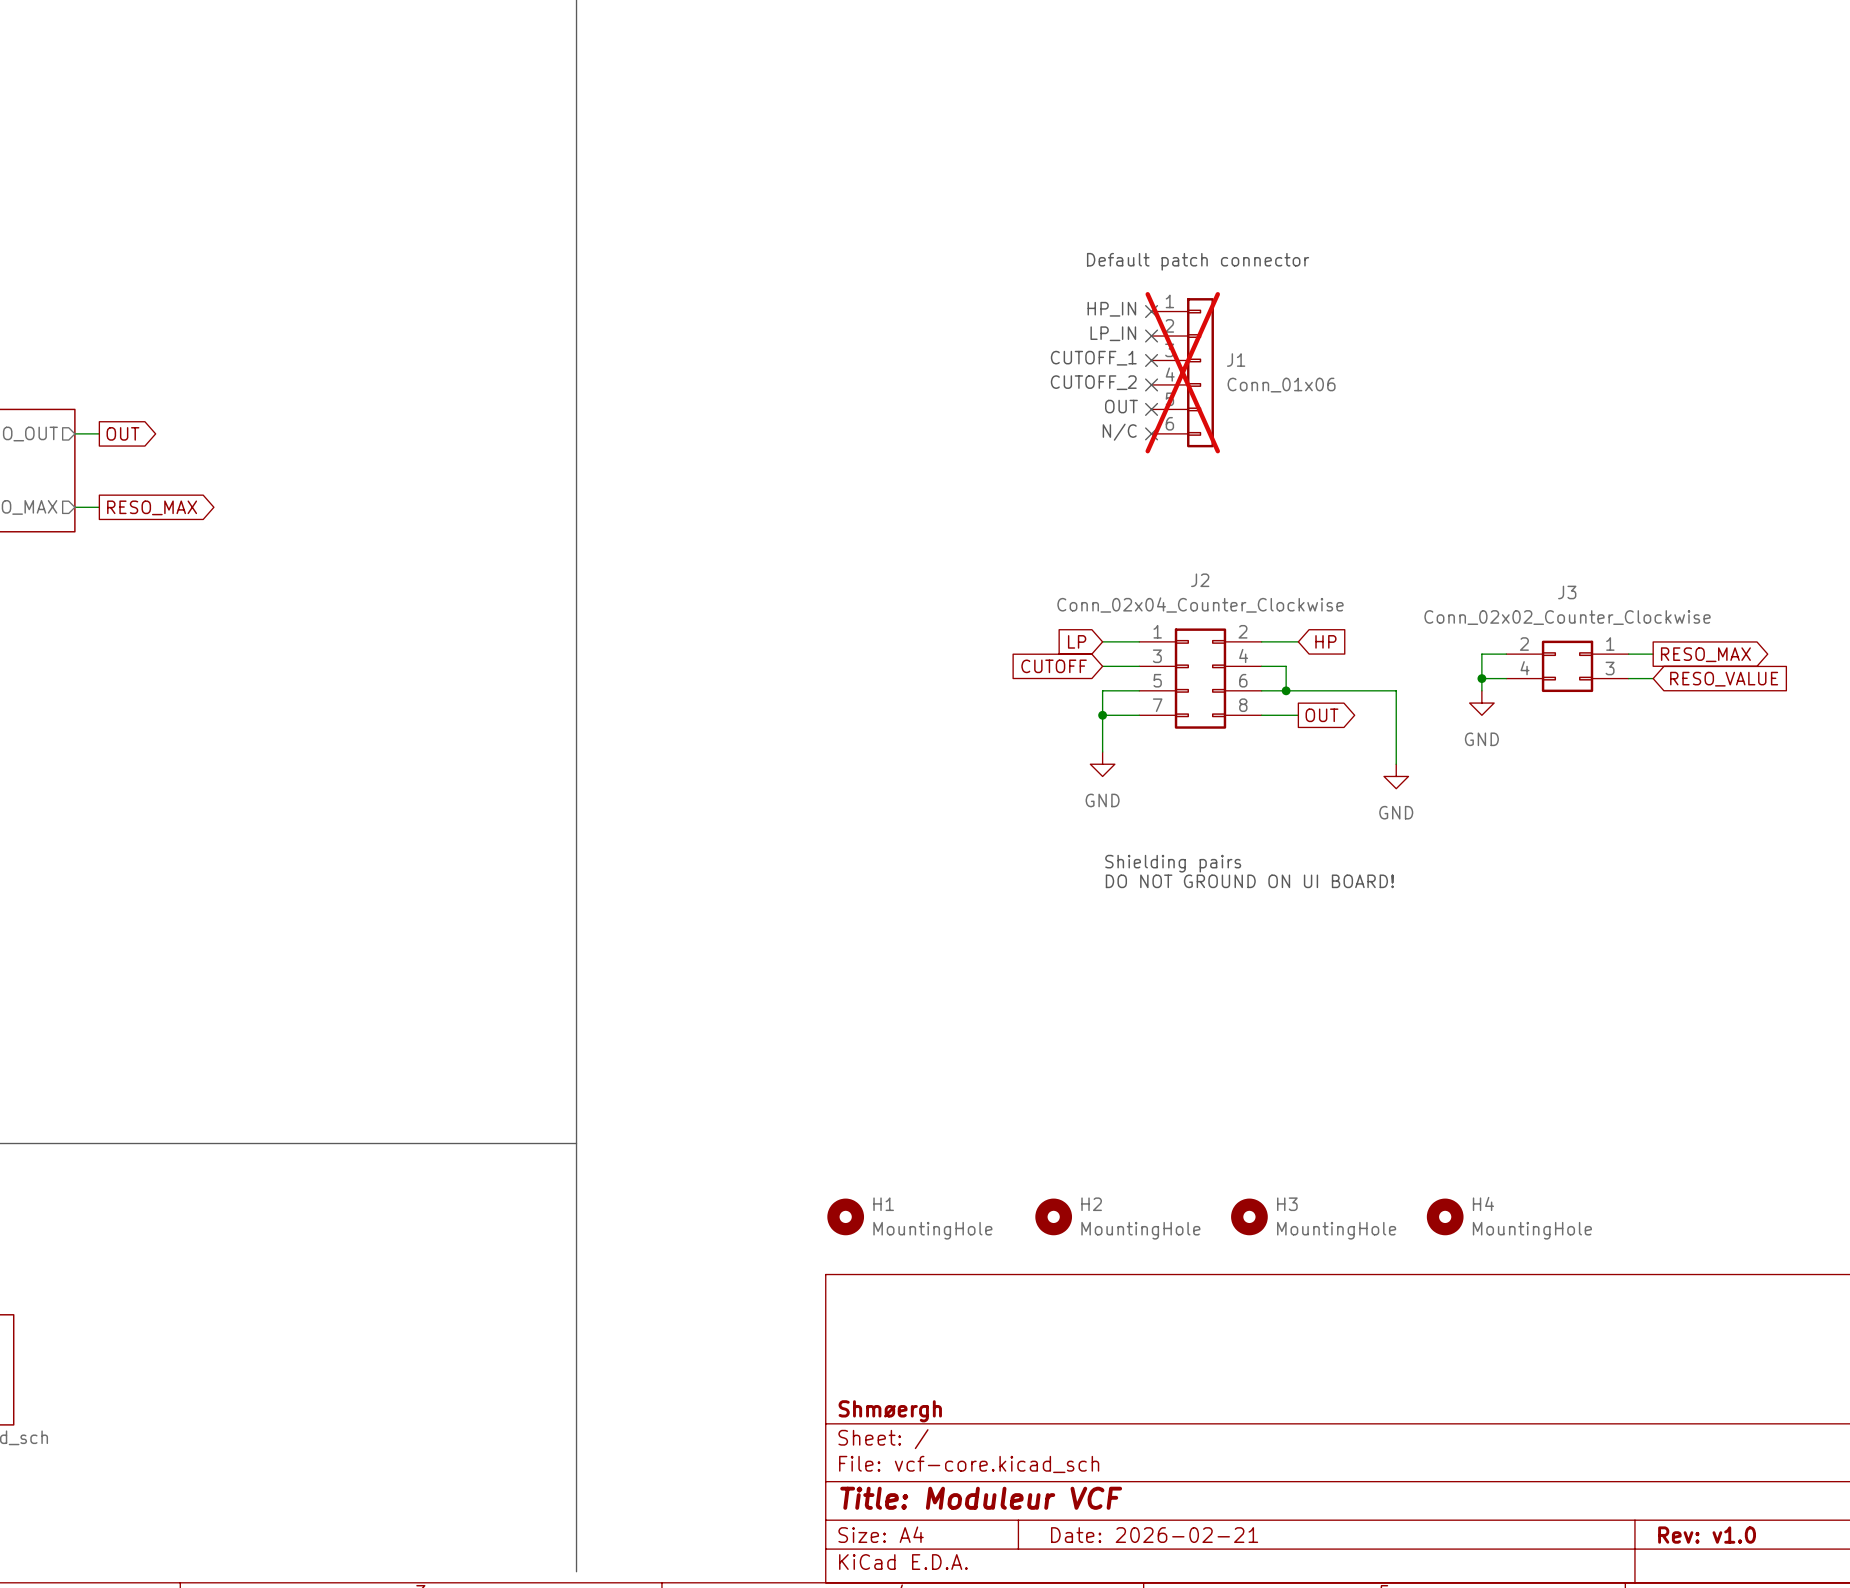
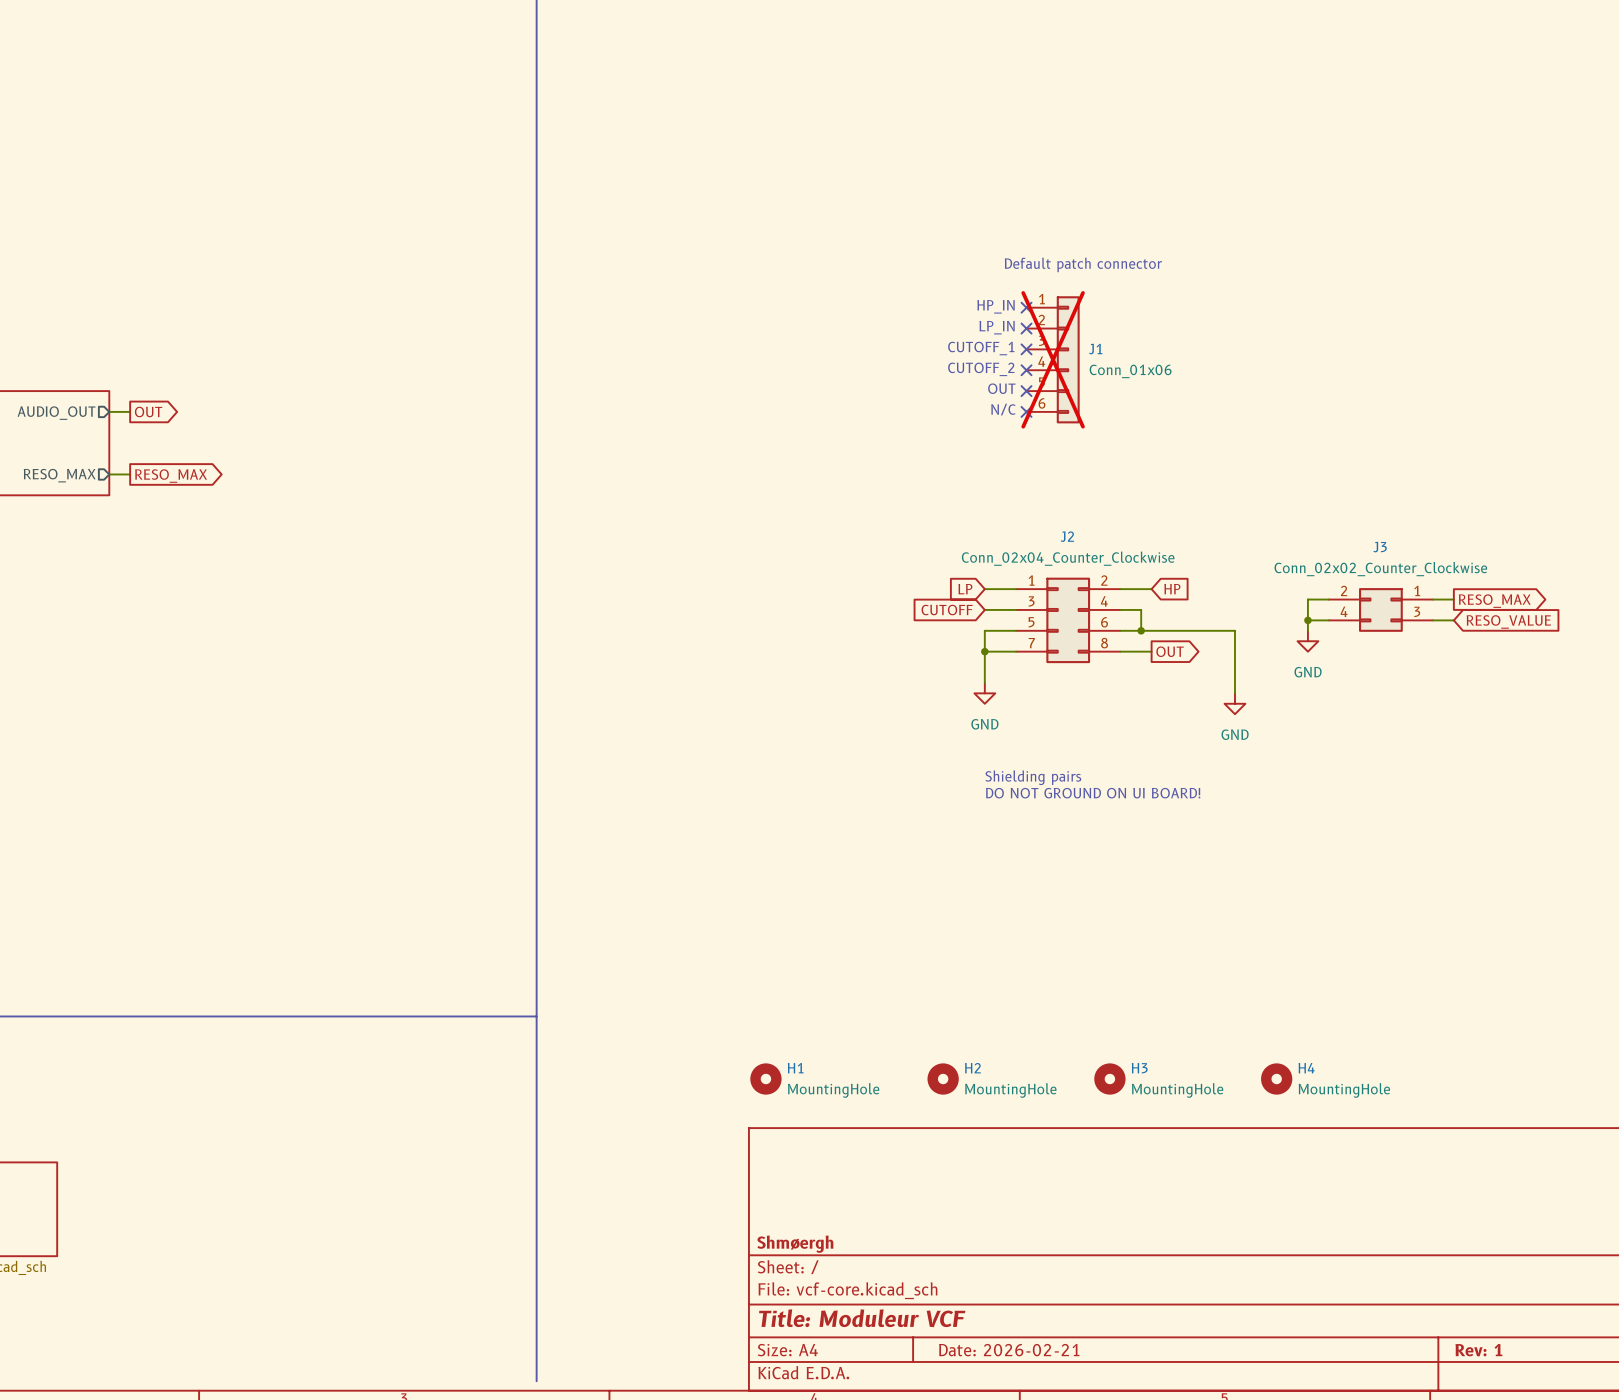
title block: Rev: v1.0 (1707, 1535) -> Rev: 1 (1478, 1350)

